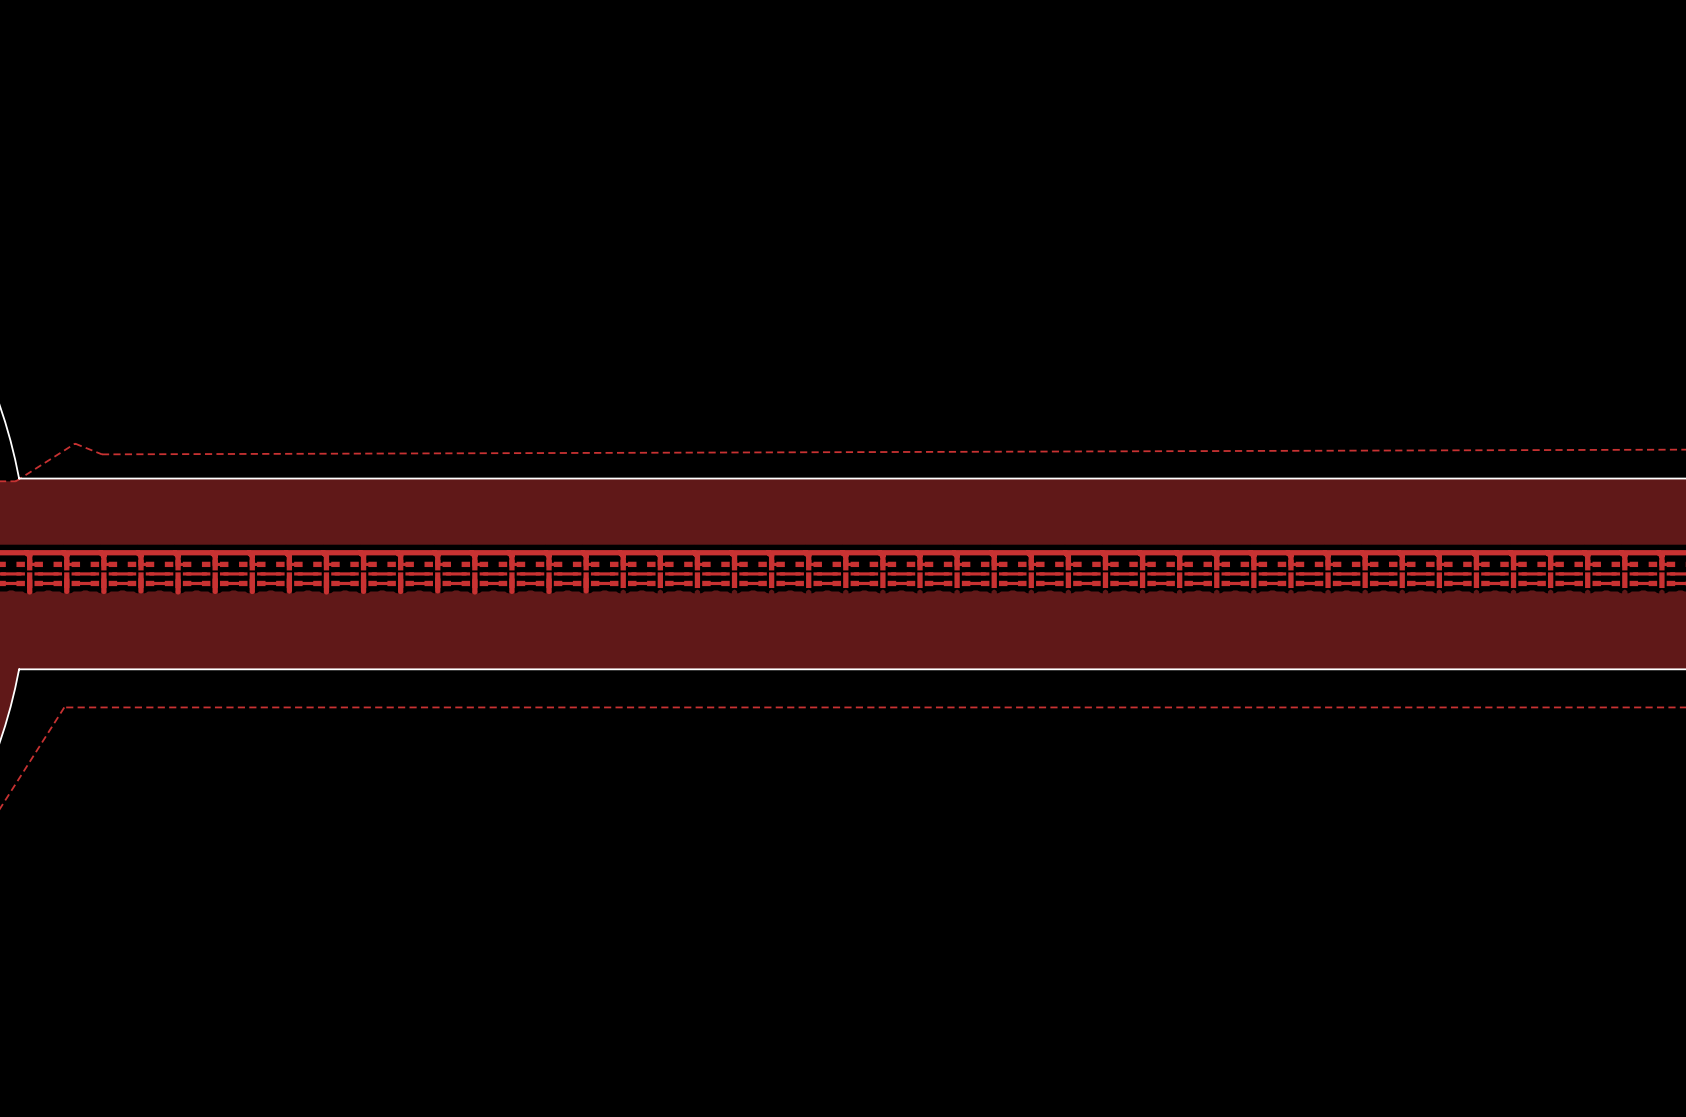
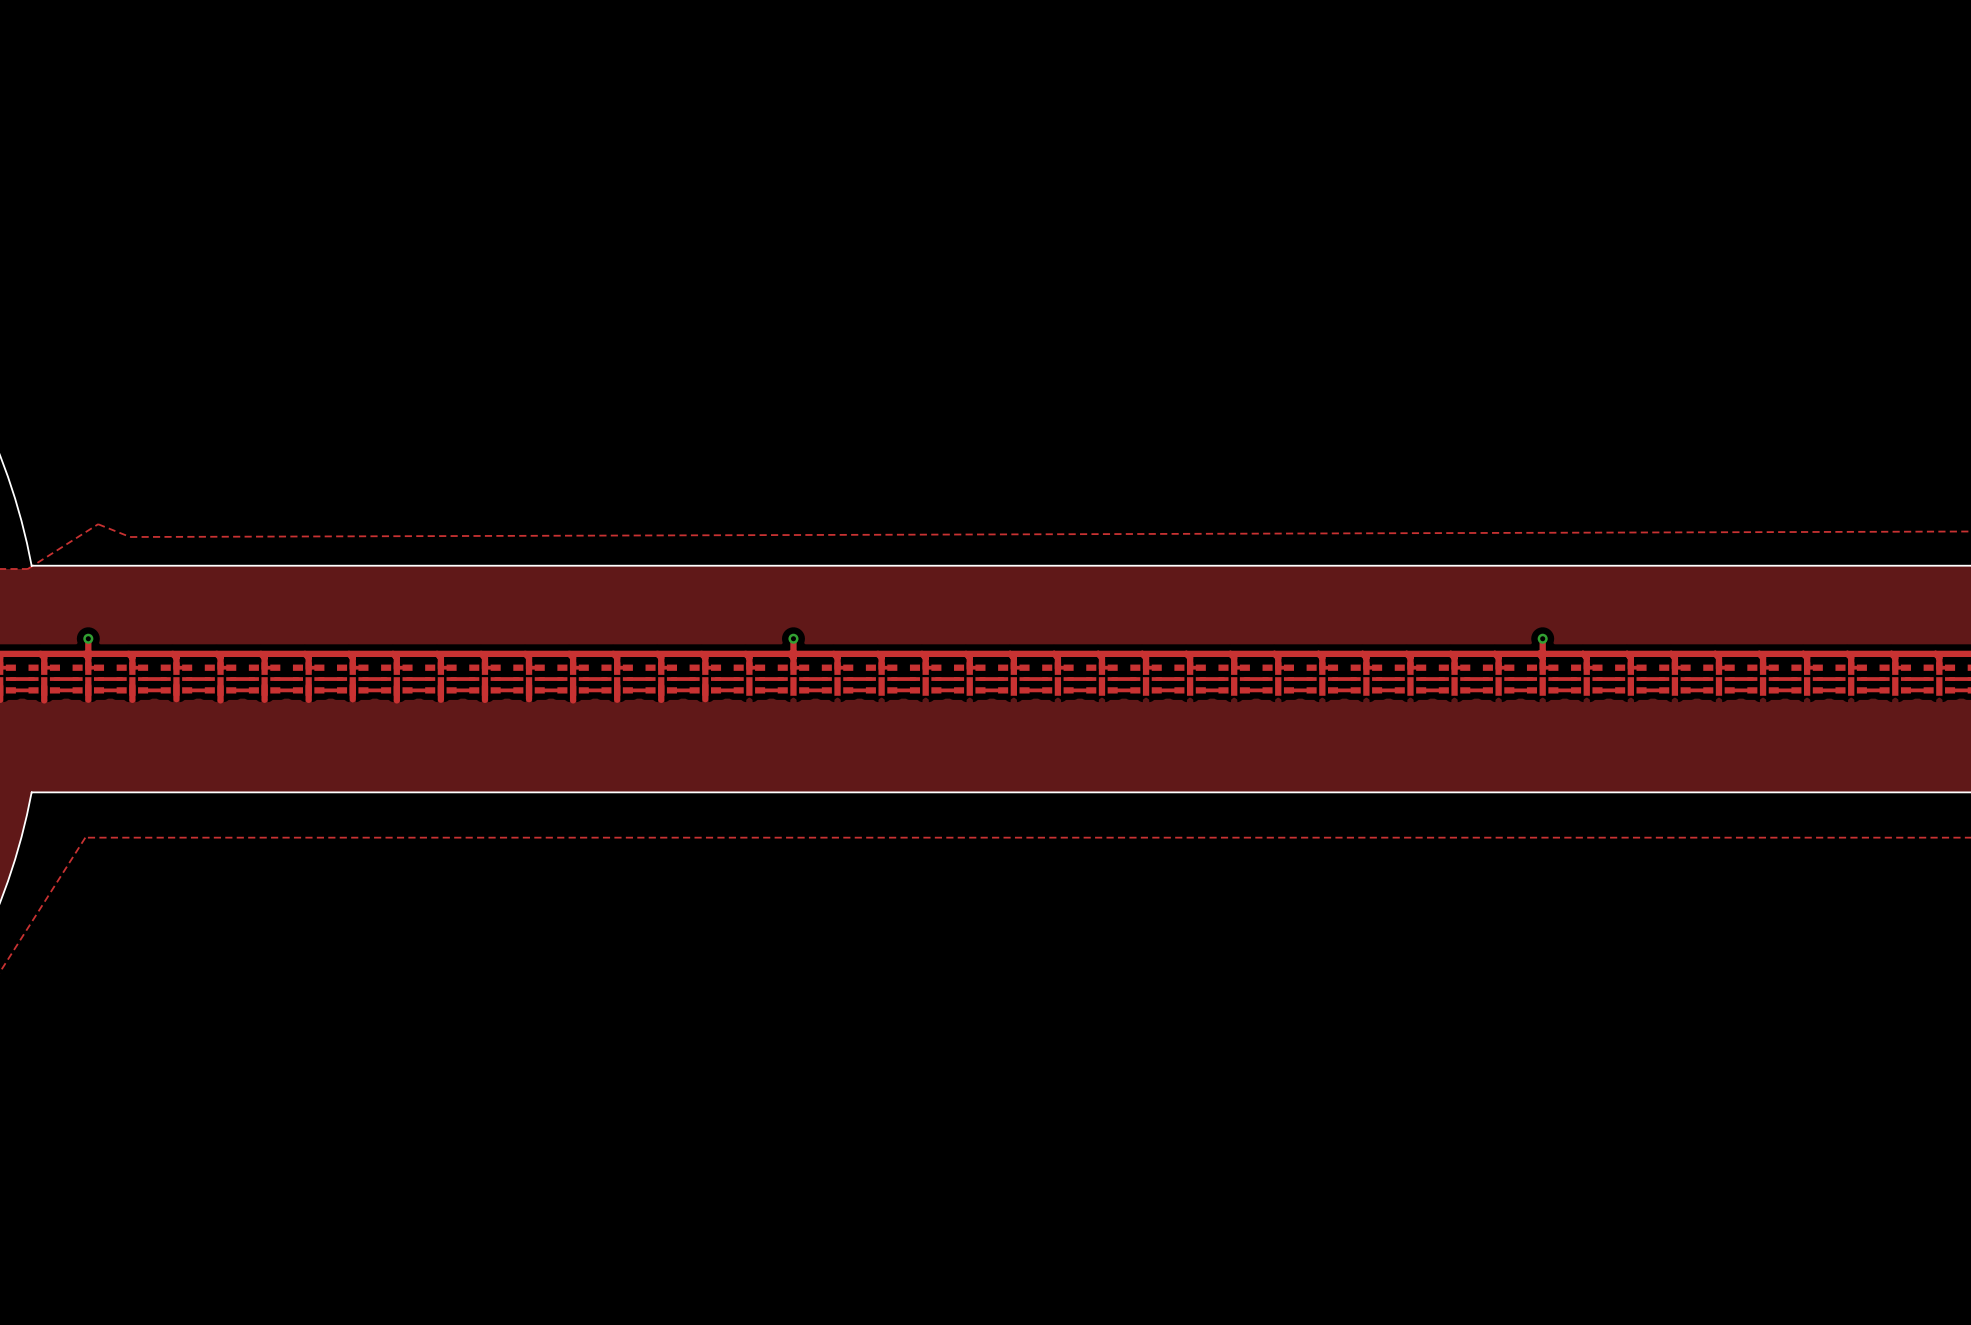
top track: none -> (88, 638) (88, 653)
via: none -> (88, 638)
top track: none -> (793, 638) (793, 653)
via: none -> (793, 638)
top track: none -> (1542, 638) (1542, 653)
via: none -> (1542, 638)

